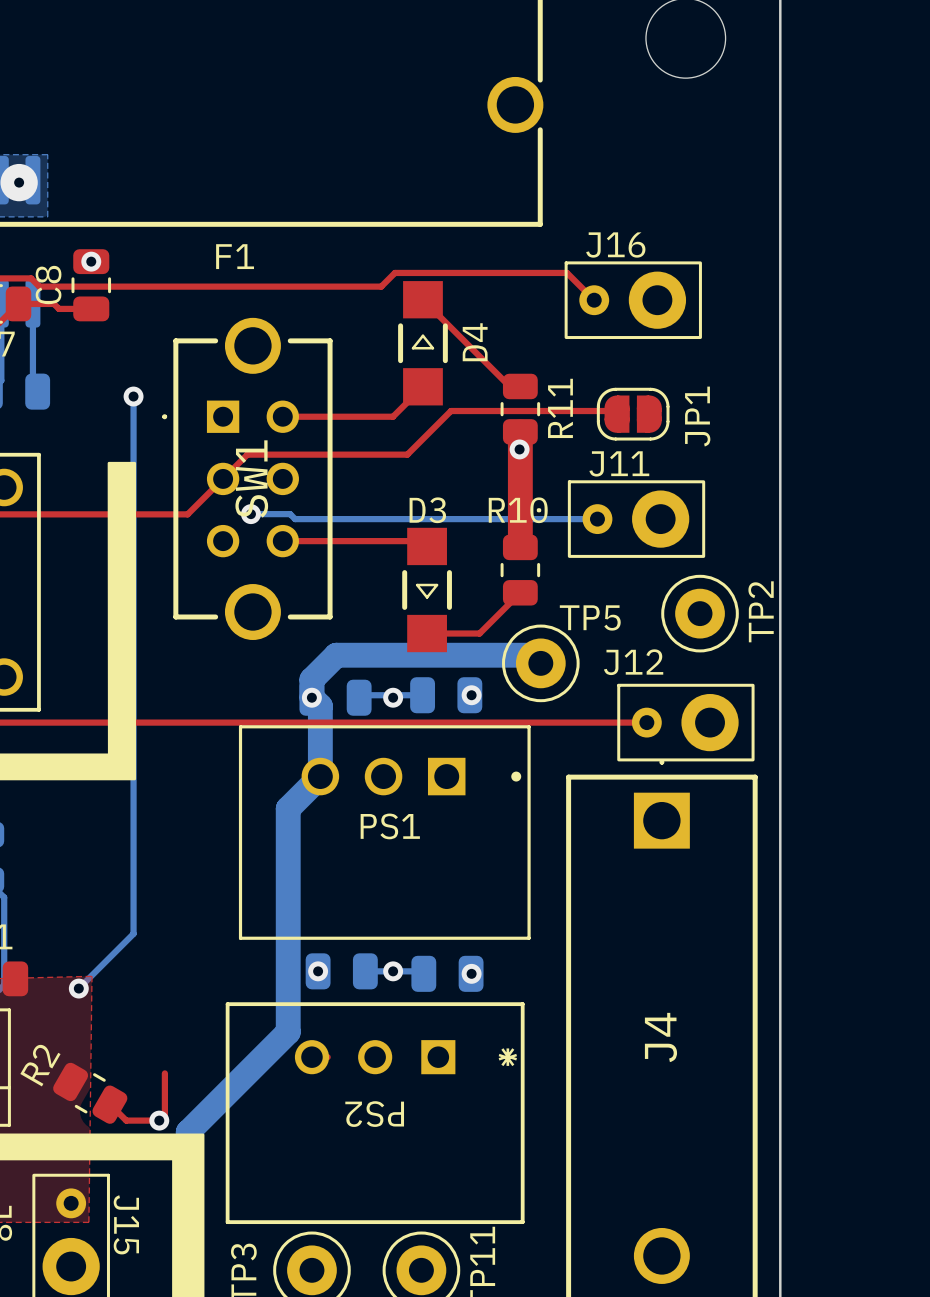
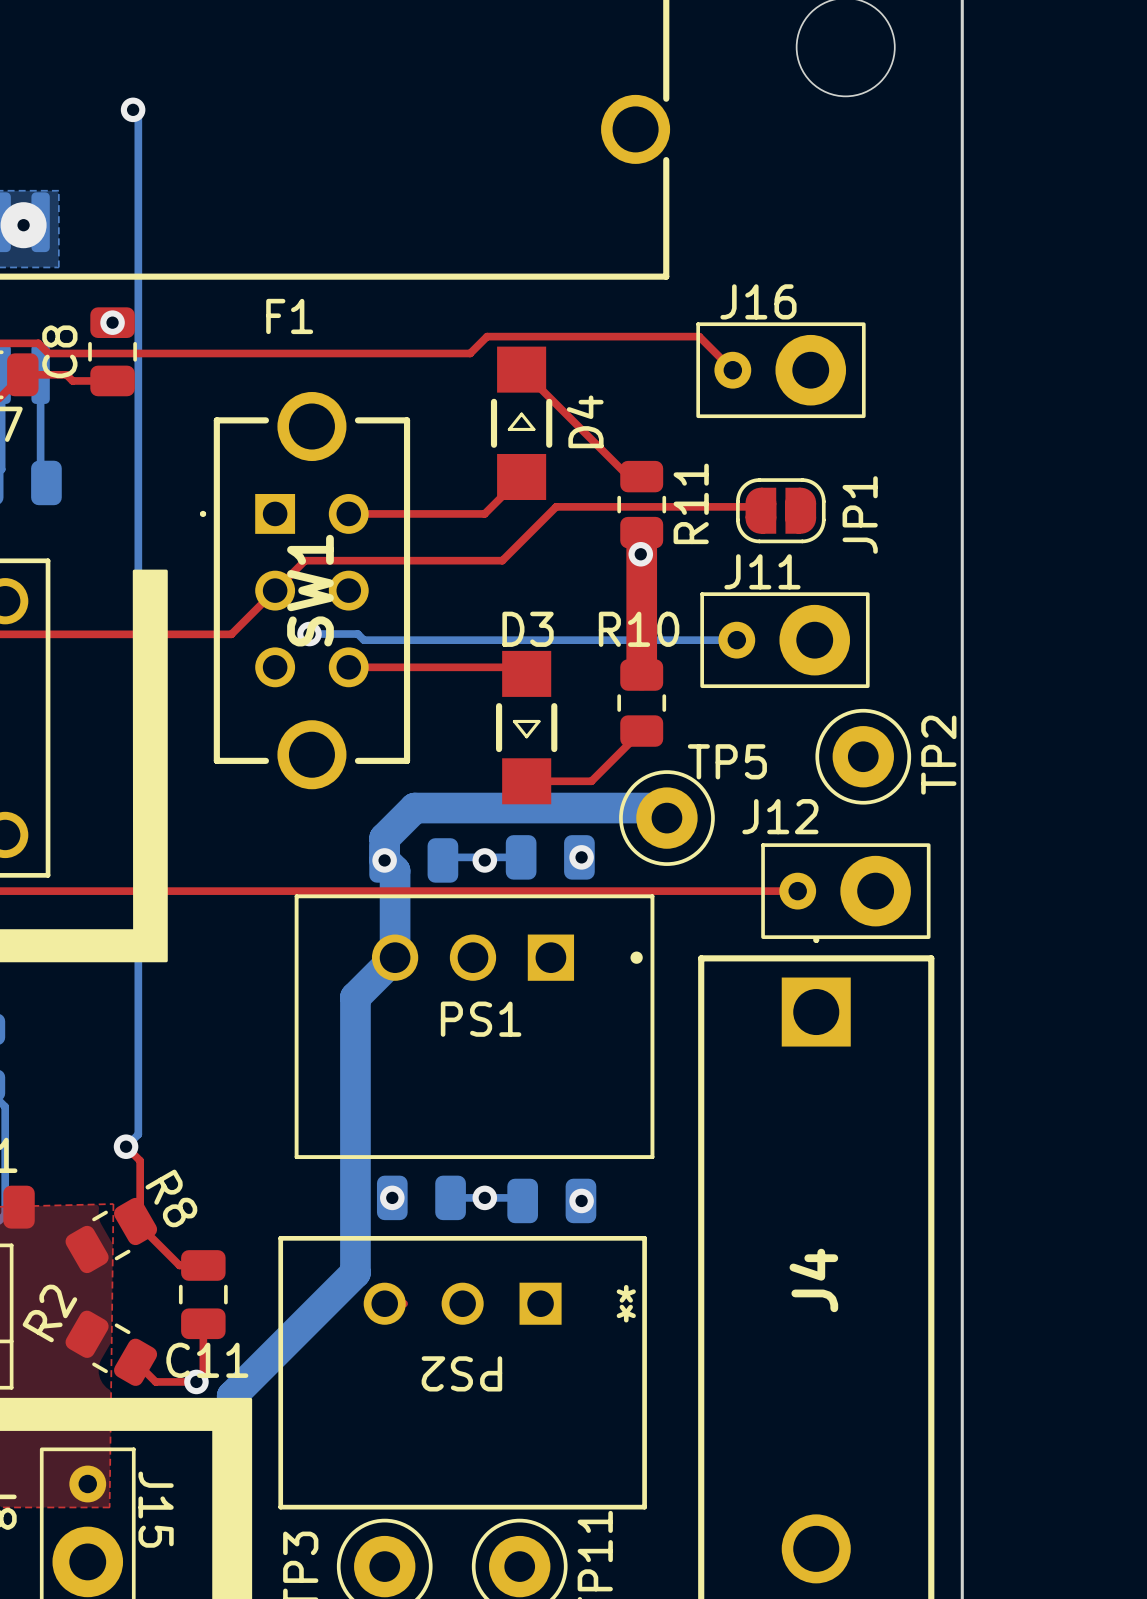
bottom track: none -> (133, 109) (138, 115) (138, 1134) (126, 1146)
via: none -> (133, 109)
bottom track: (133, 396) (133, 933) (78, 988) -> none
via: (133, 396) -> none
top track: none -> (126, 1146) (140, 1160) (140, 1216) (135, 1221) (179, 1265) (203, 1265)
via position: (78, 988) -> (126, 1146)
R8: none -> (111, 1235)
C11: none -> (203, 1294)

